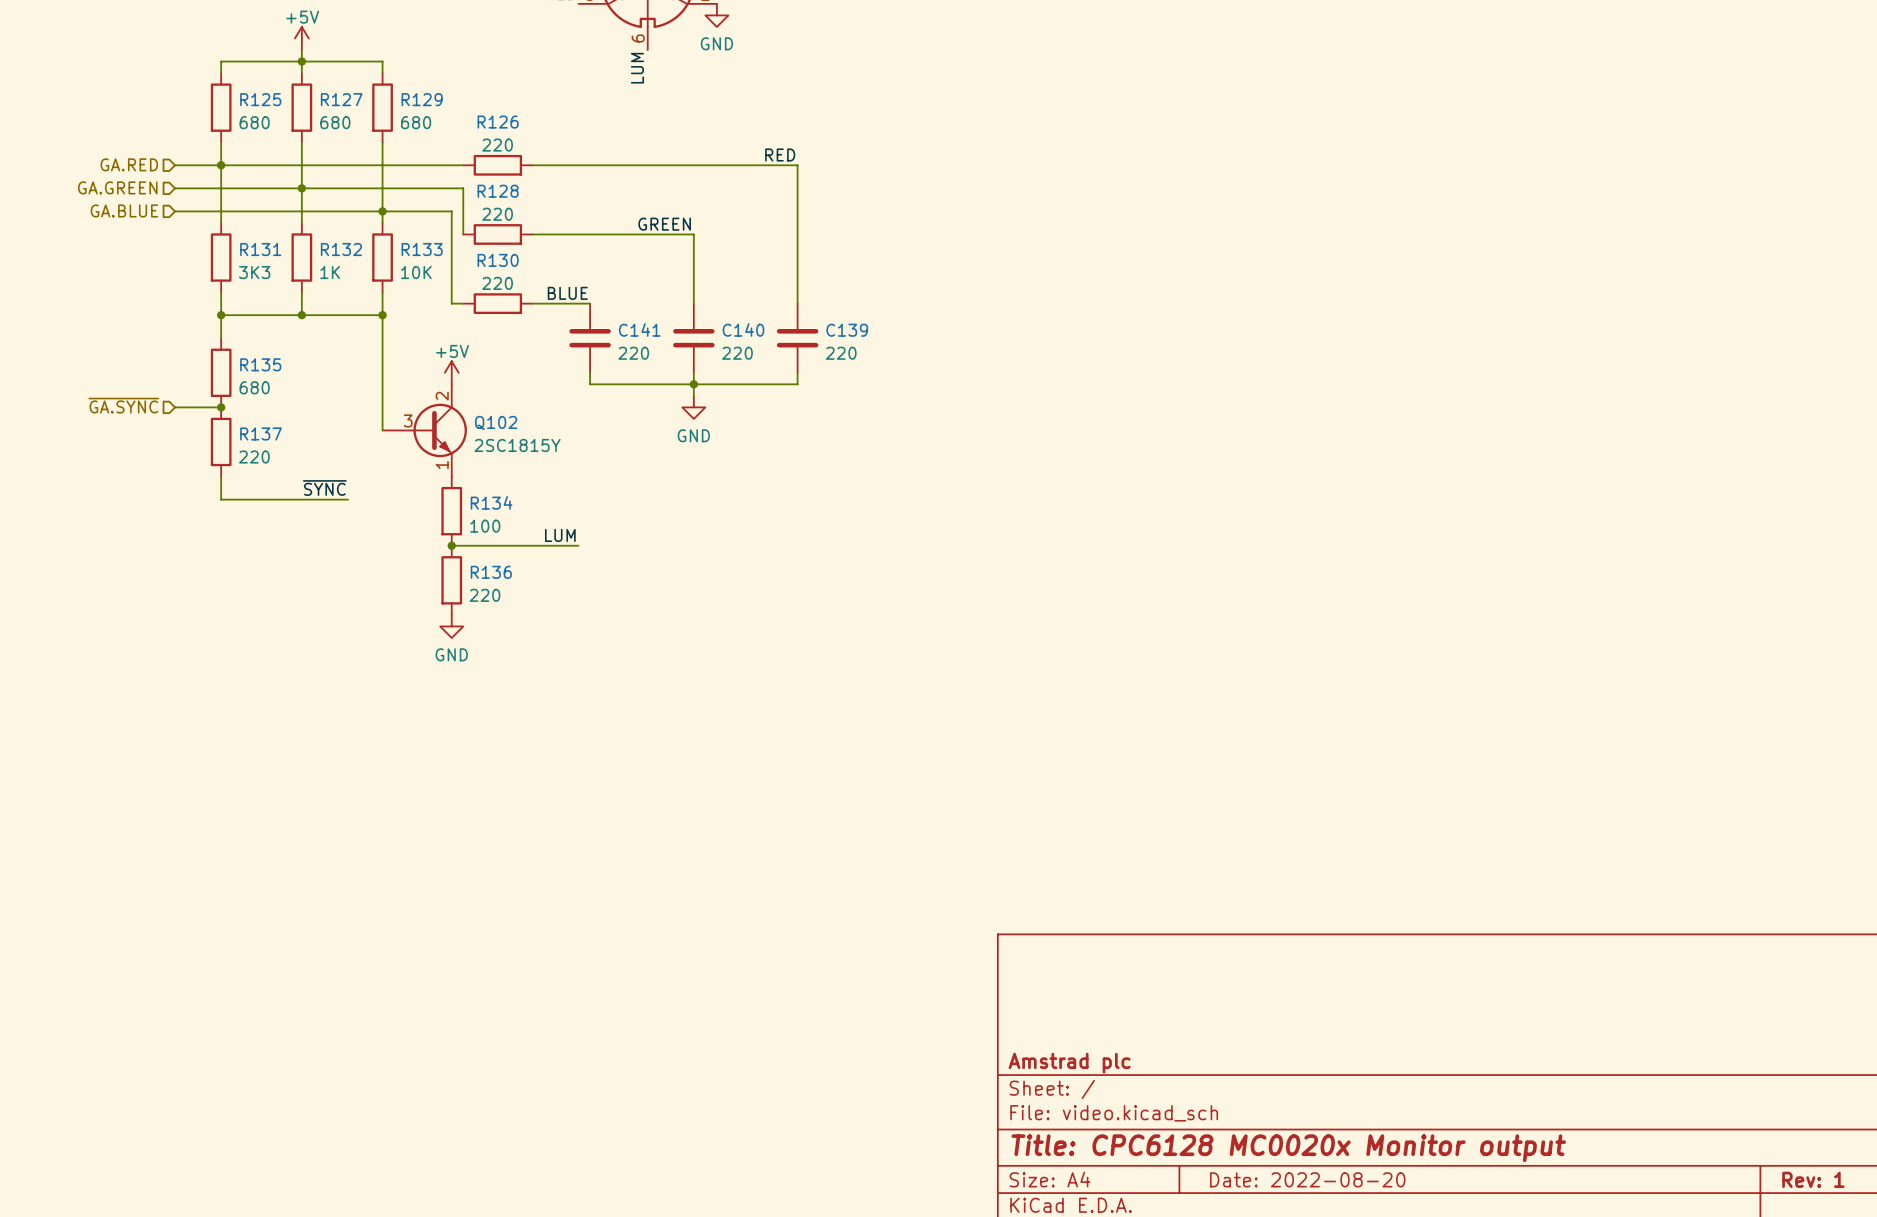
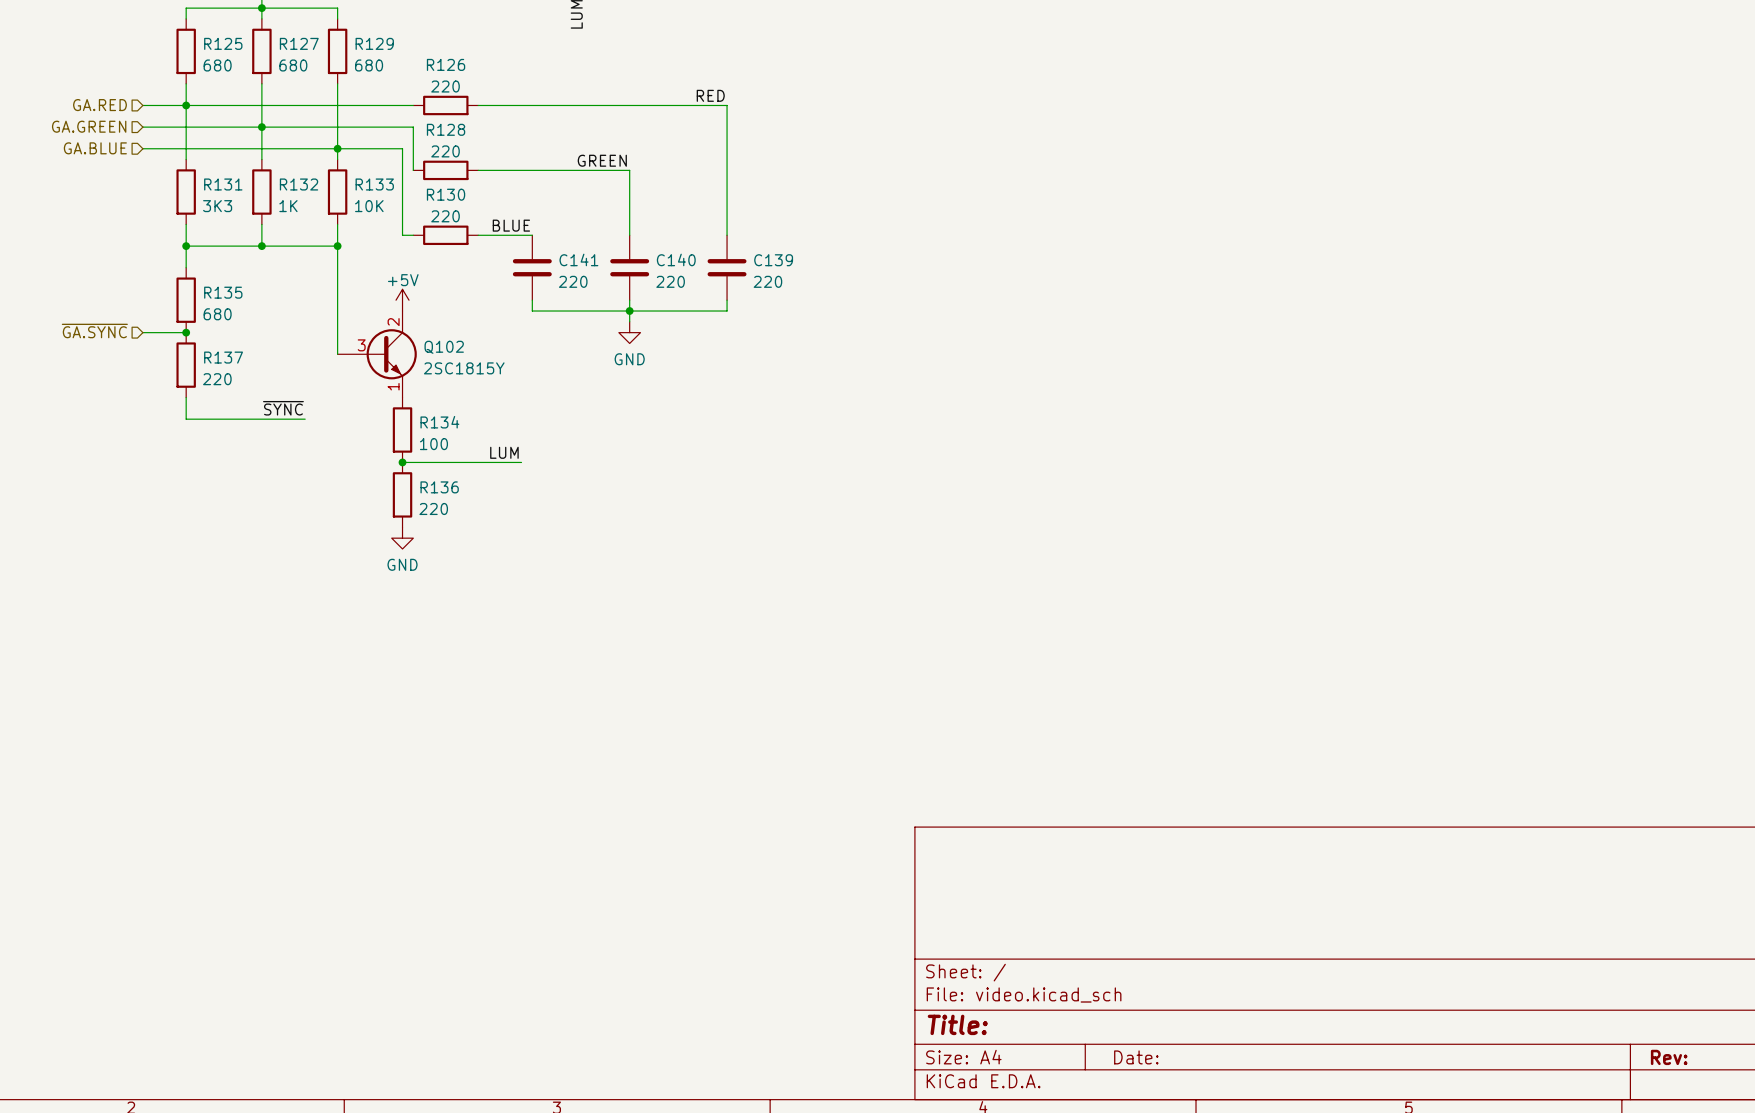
title block: Amstrad plc (1069, 1063) -> none
title block: Title: CPC6128 MC0020x Monitor output (1288, 1148) -> Title: (957, 1024)
title block: Date: 2022-08-20 (1307, 1179) -> Date: (1136, 1057)
title block: Rev: 1 (1813, 1179) -> Rev: (1669, 1057)

